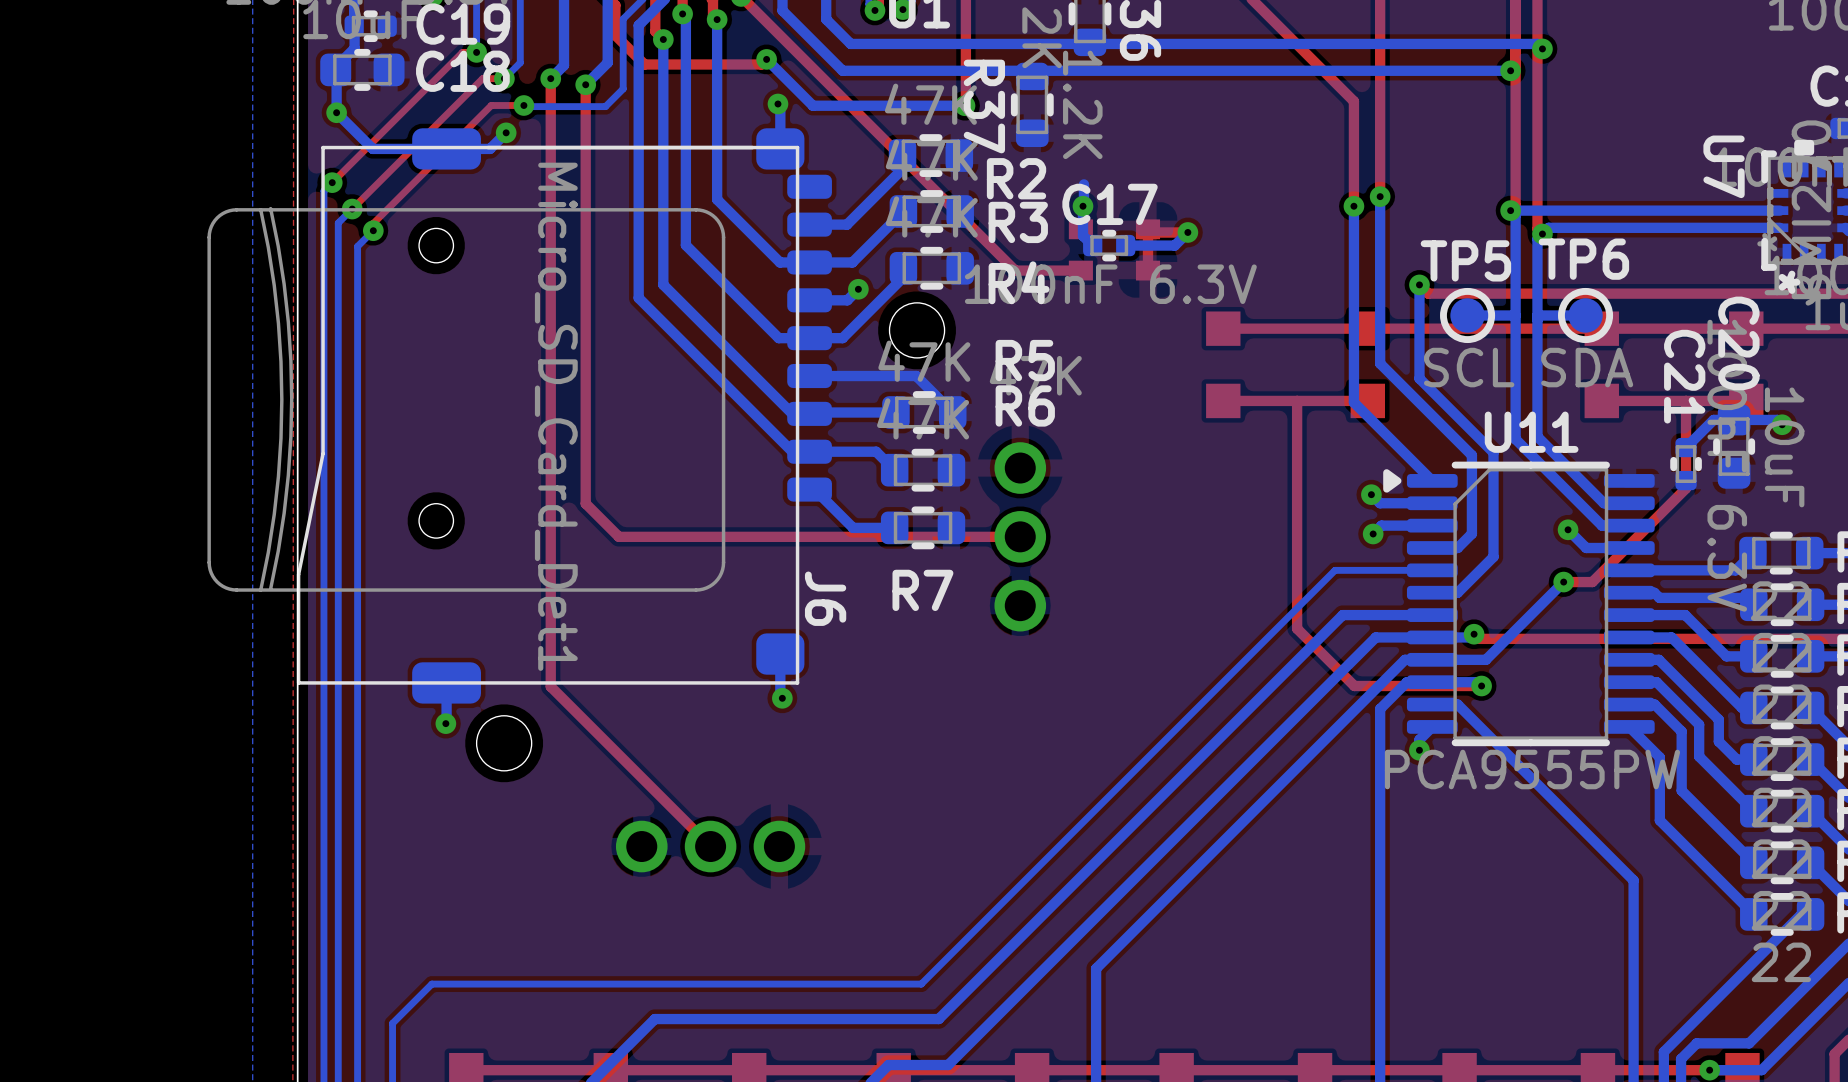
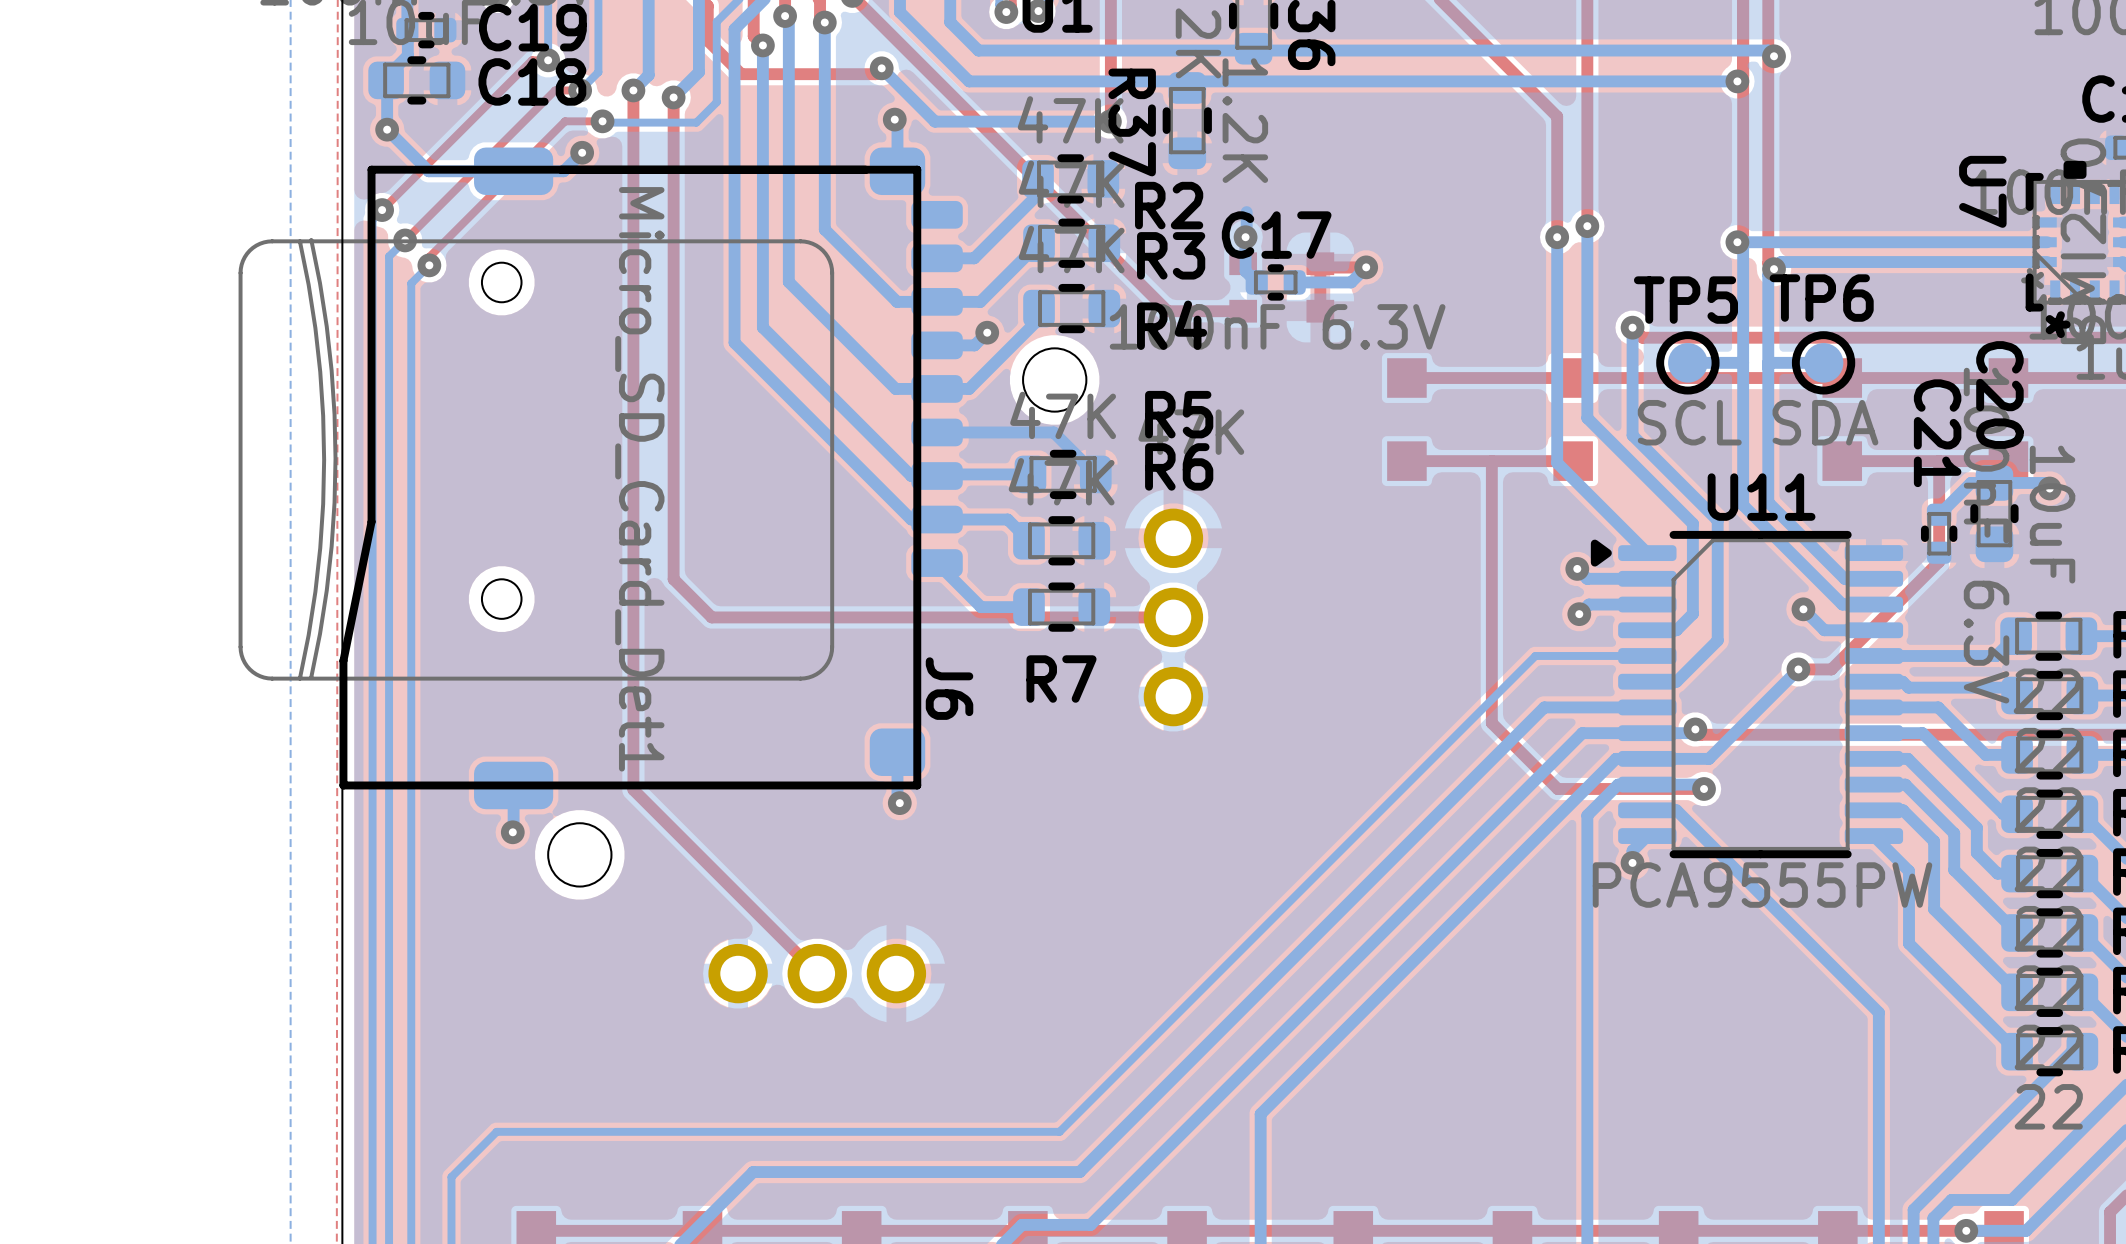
J6 footprint: [207, 128, 832, 704] -> [238, 147, 963, 810]

